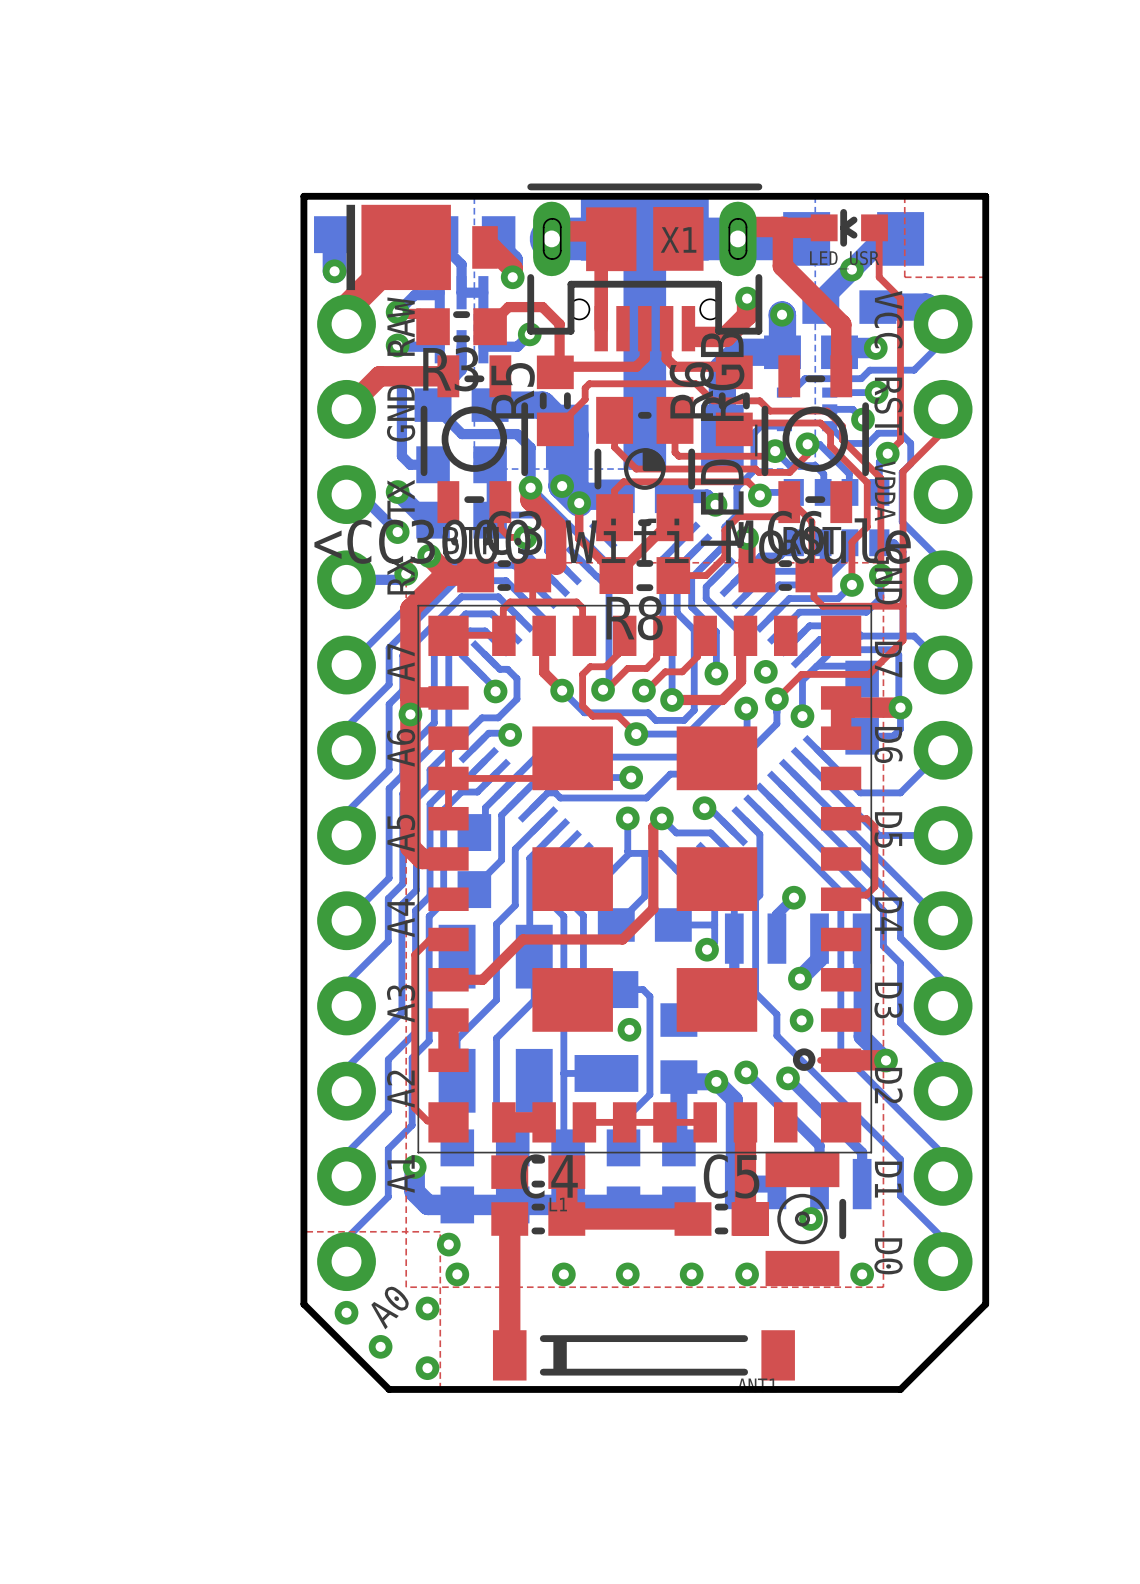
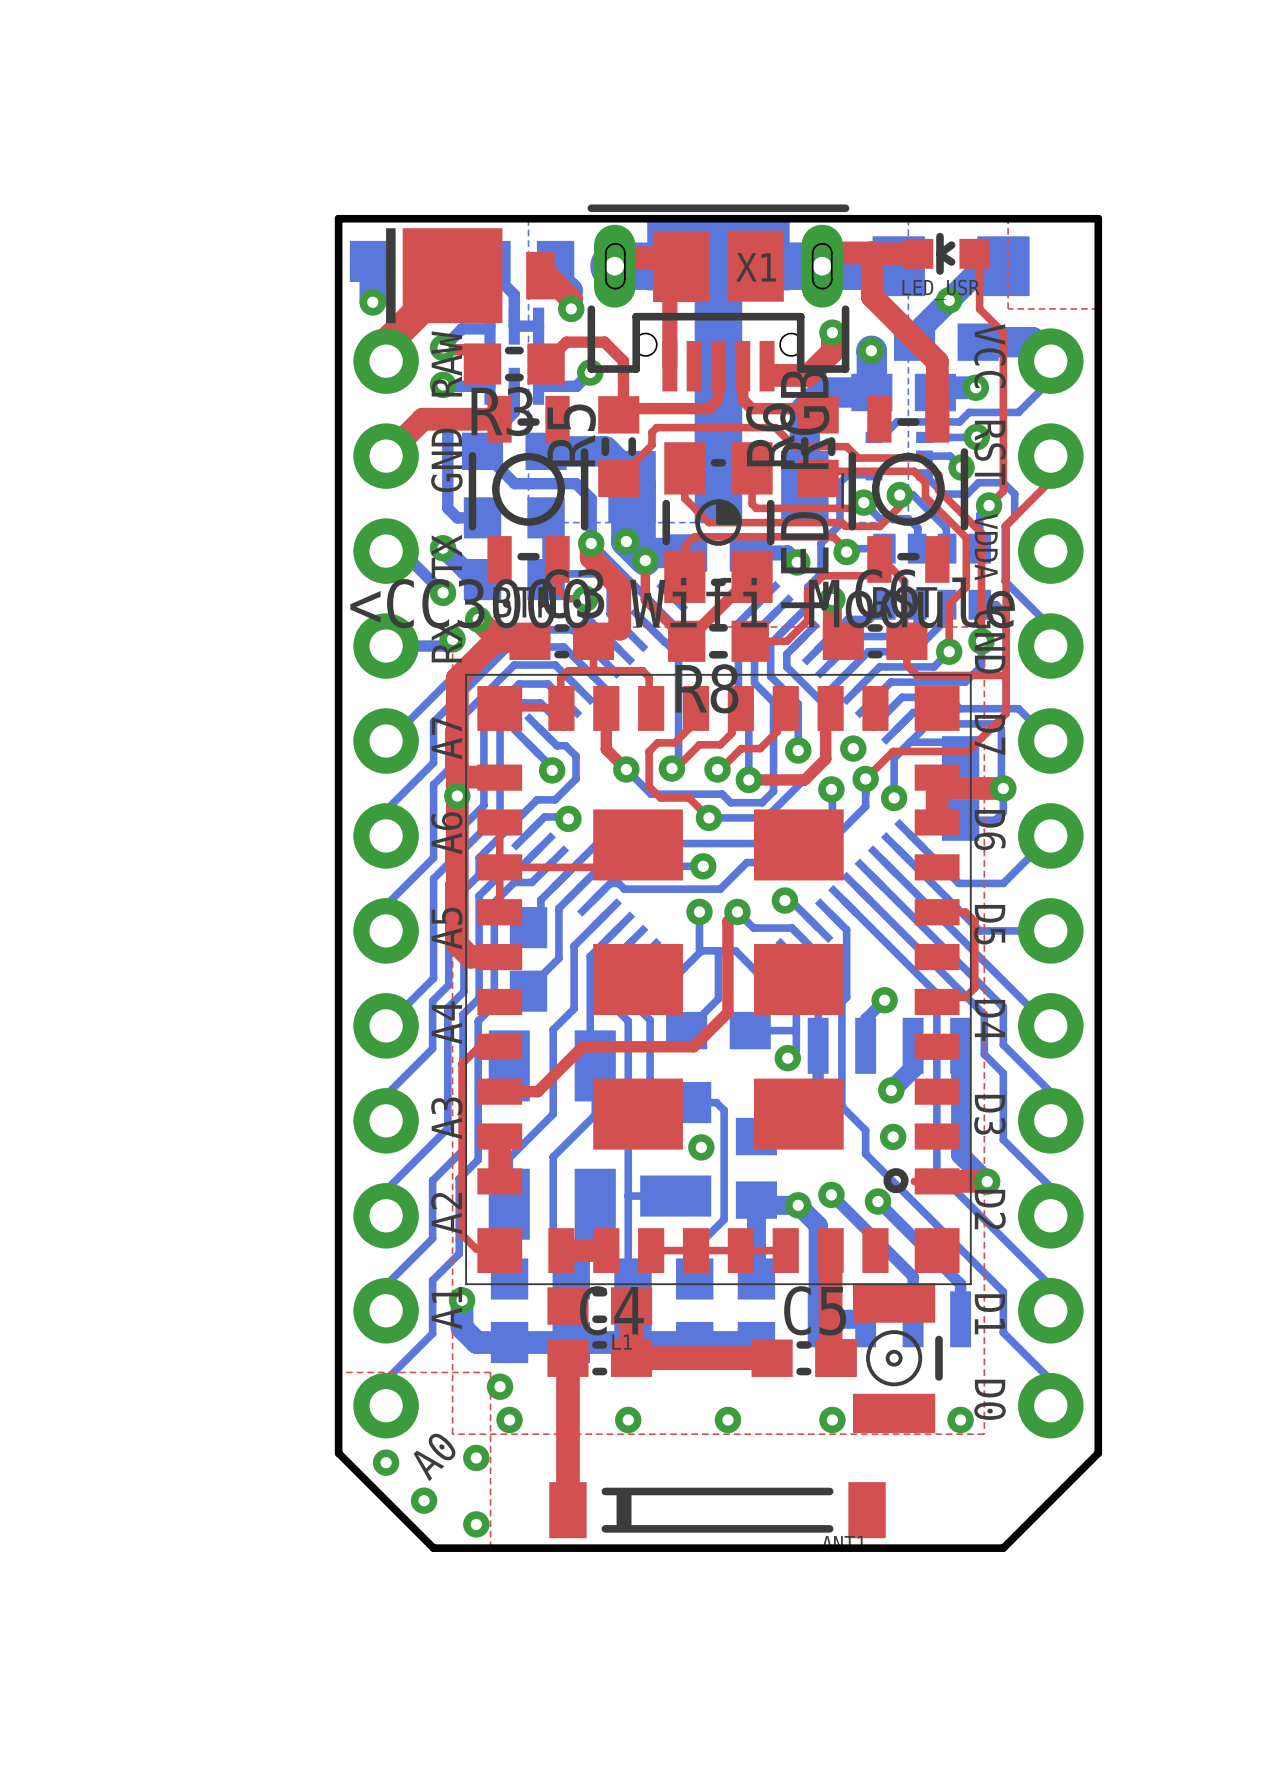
via: (811, 1219) -> none
via: (627, 1274) -> none
via: none -> (727, 1419)
via: (691, 1274) -> none

